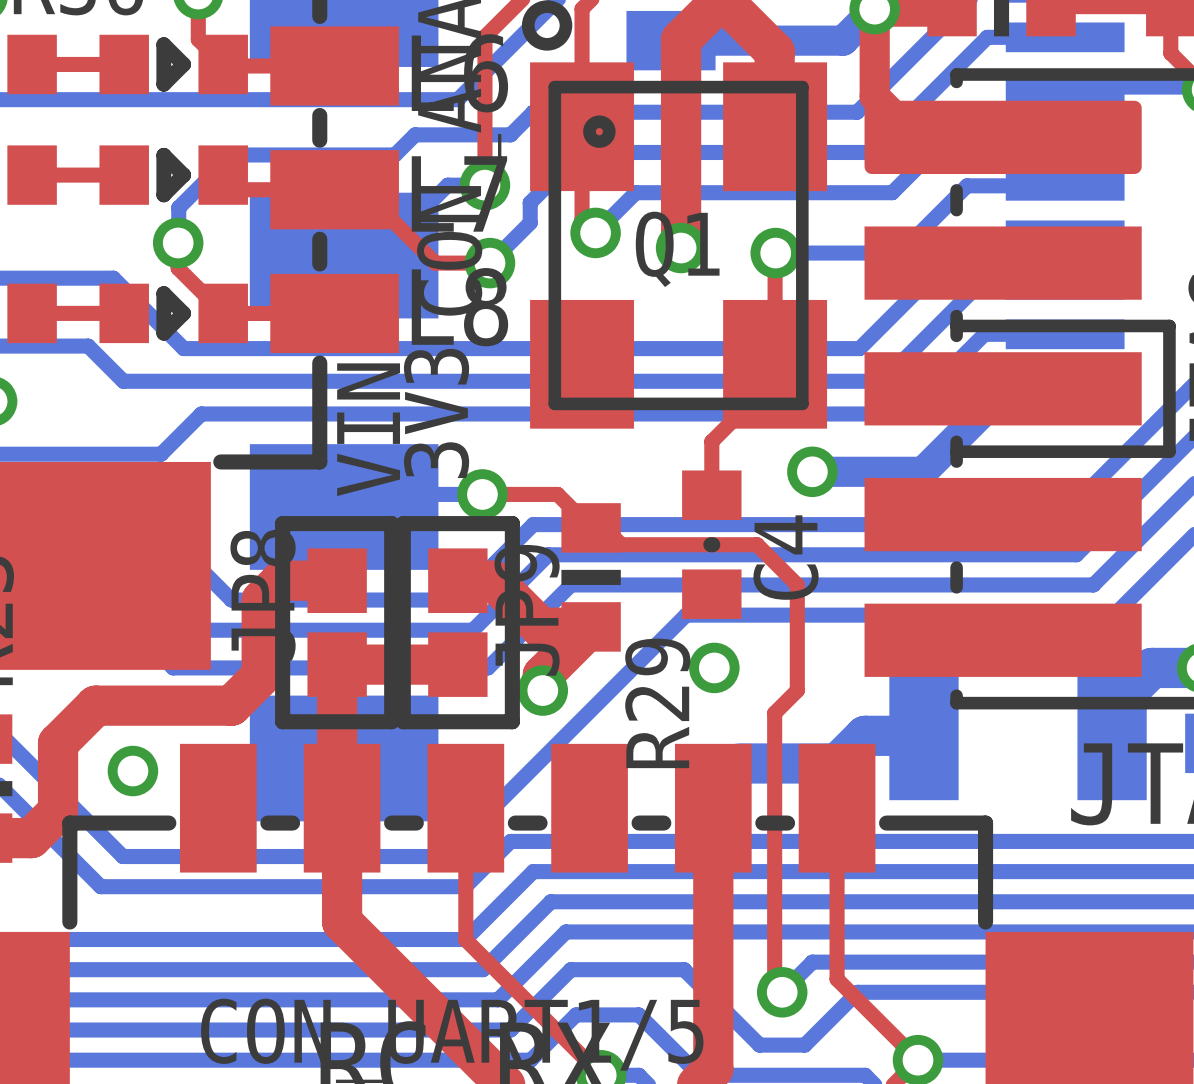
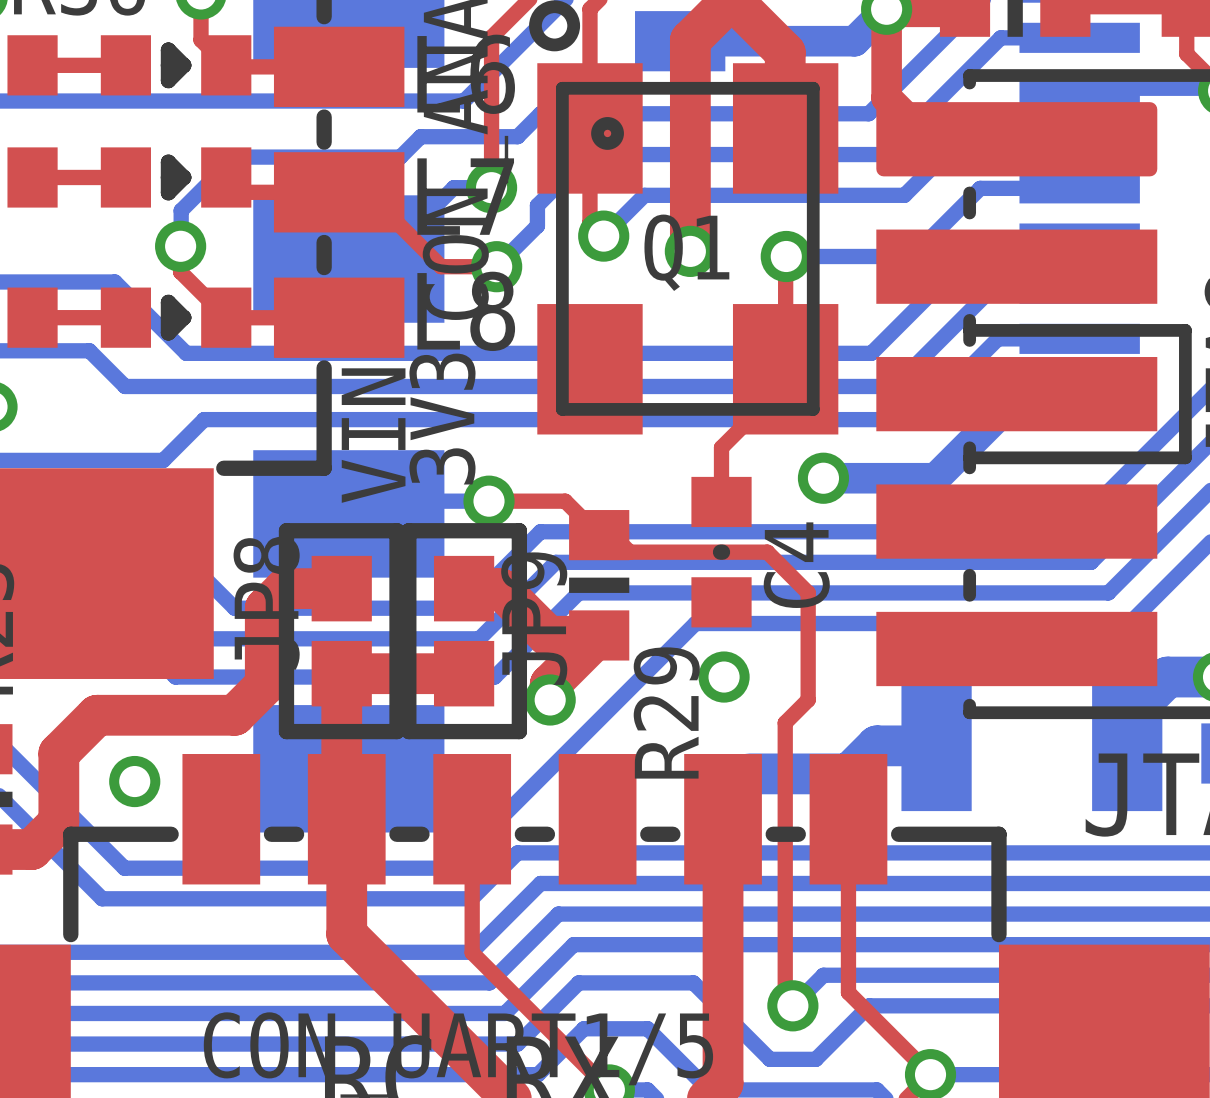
part footprint: [99, 34, 248, 95] -> [100, 35, 252, 96]
part footprint: [99, 145, 248, 205] -> [100, 147, 252, 208]
part footprint: [99, 283, 248, 344] -> [100, 287, 252, 348]

